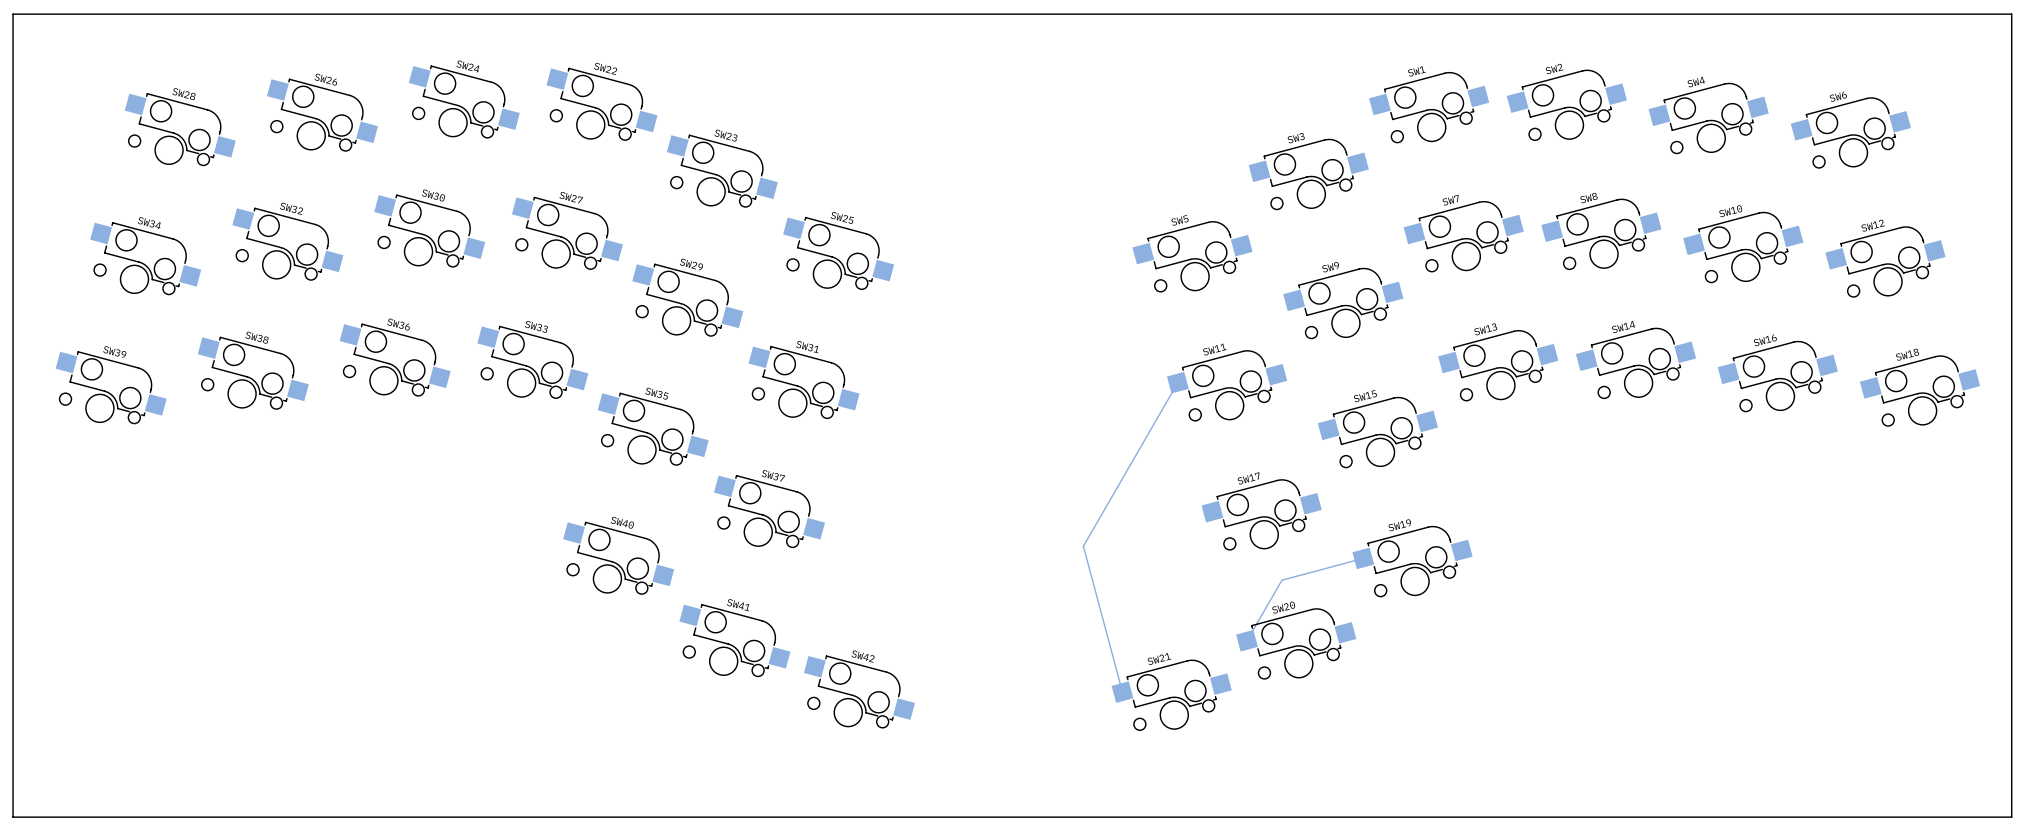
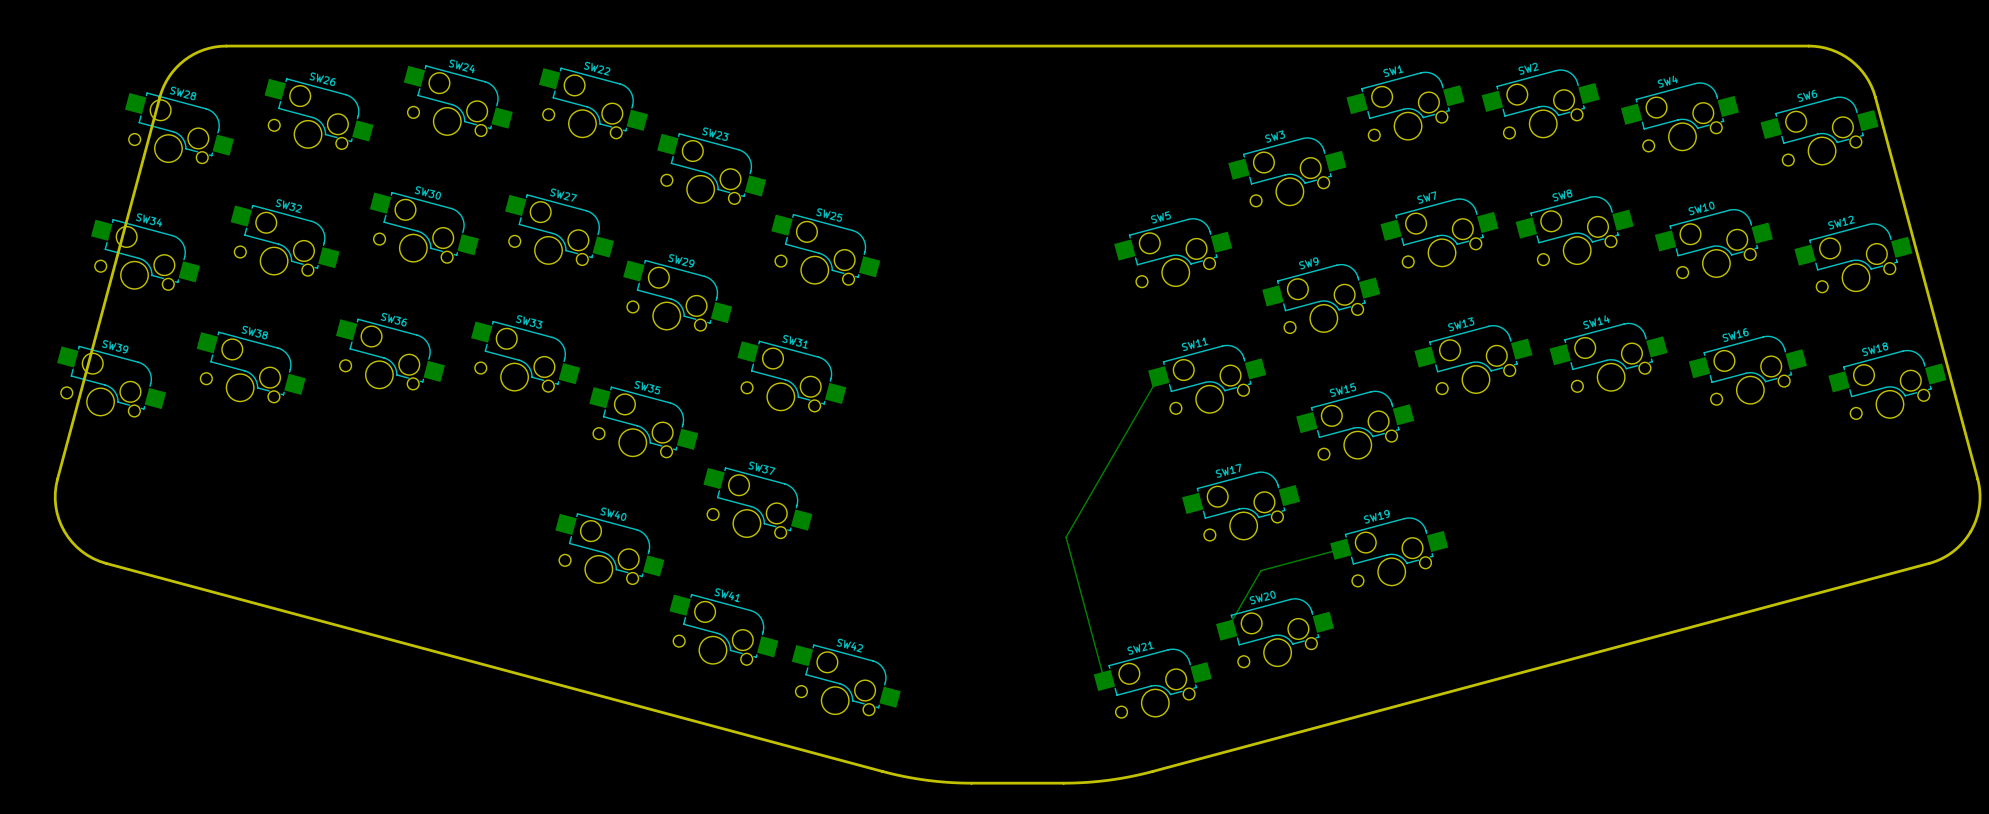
board edge: (2011, 14) (13, 14) (13, 817) (2011, 817) (2011, 14) -> (1808, 46) (1831, 49) (1850, 60) (1865, 76) (1875, 97) (1978, 482) (1980, 499) (1977, 515) (1970, 531) (1962, 542) (1947, 555) (1929, 563) (1152, 771) (1114, 779) (1069, 783) (954, 782) (893, 774) (106, 563) (93, 558) (76, 546) (64, 531) (57, 512) (55, 492) (57, 479) (161, 91) (169, 76) (180, 63) (193, 54) (209, 48) (226, 46) (1808, 46)

